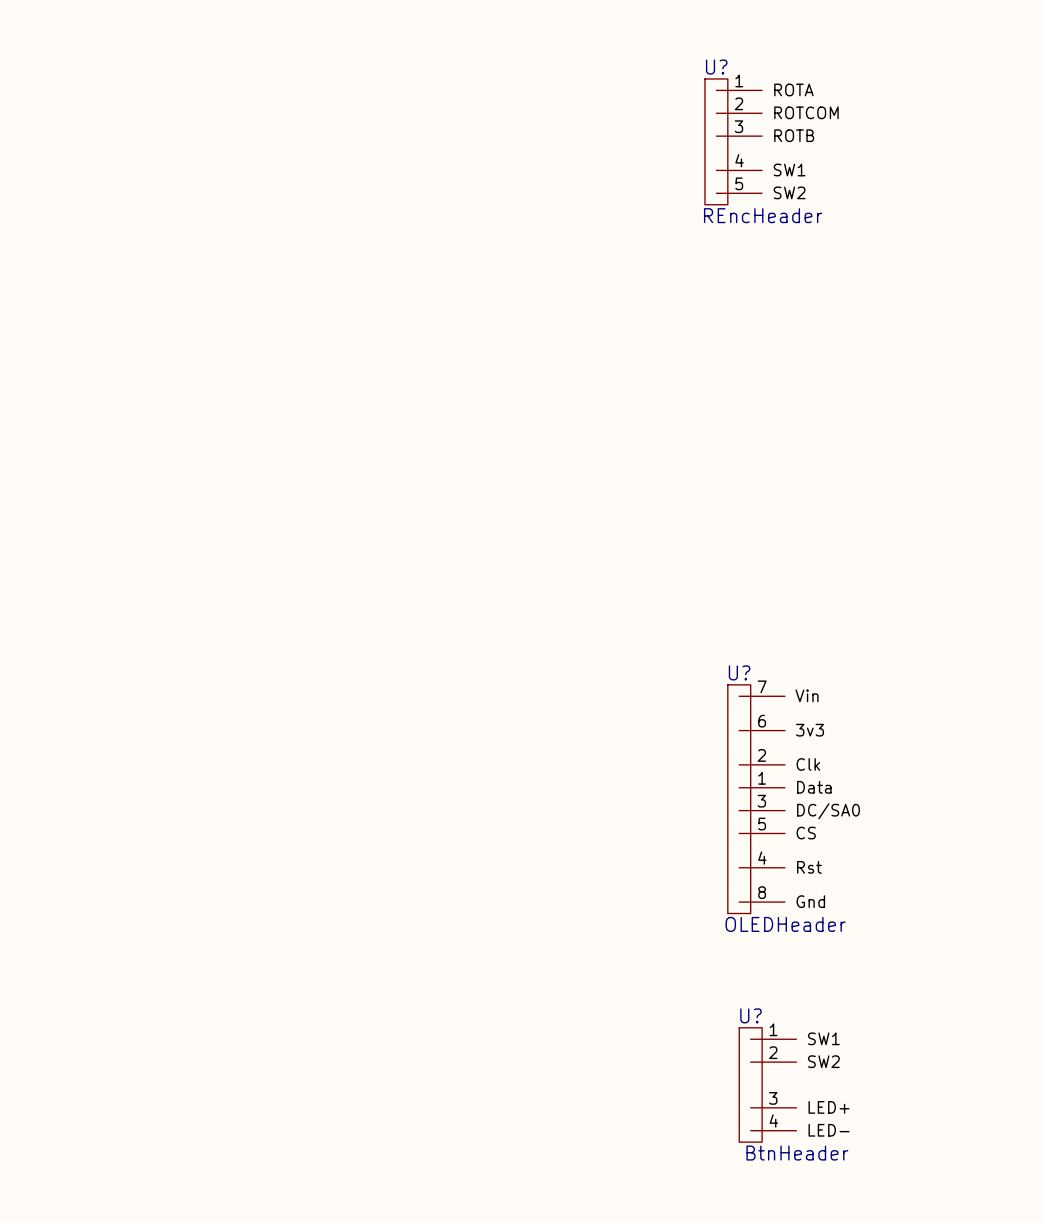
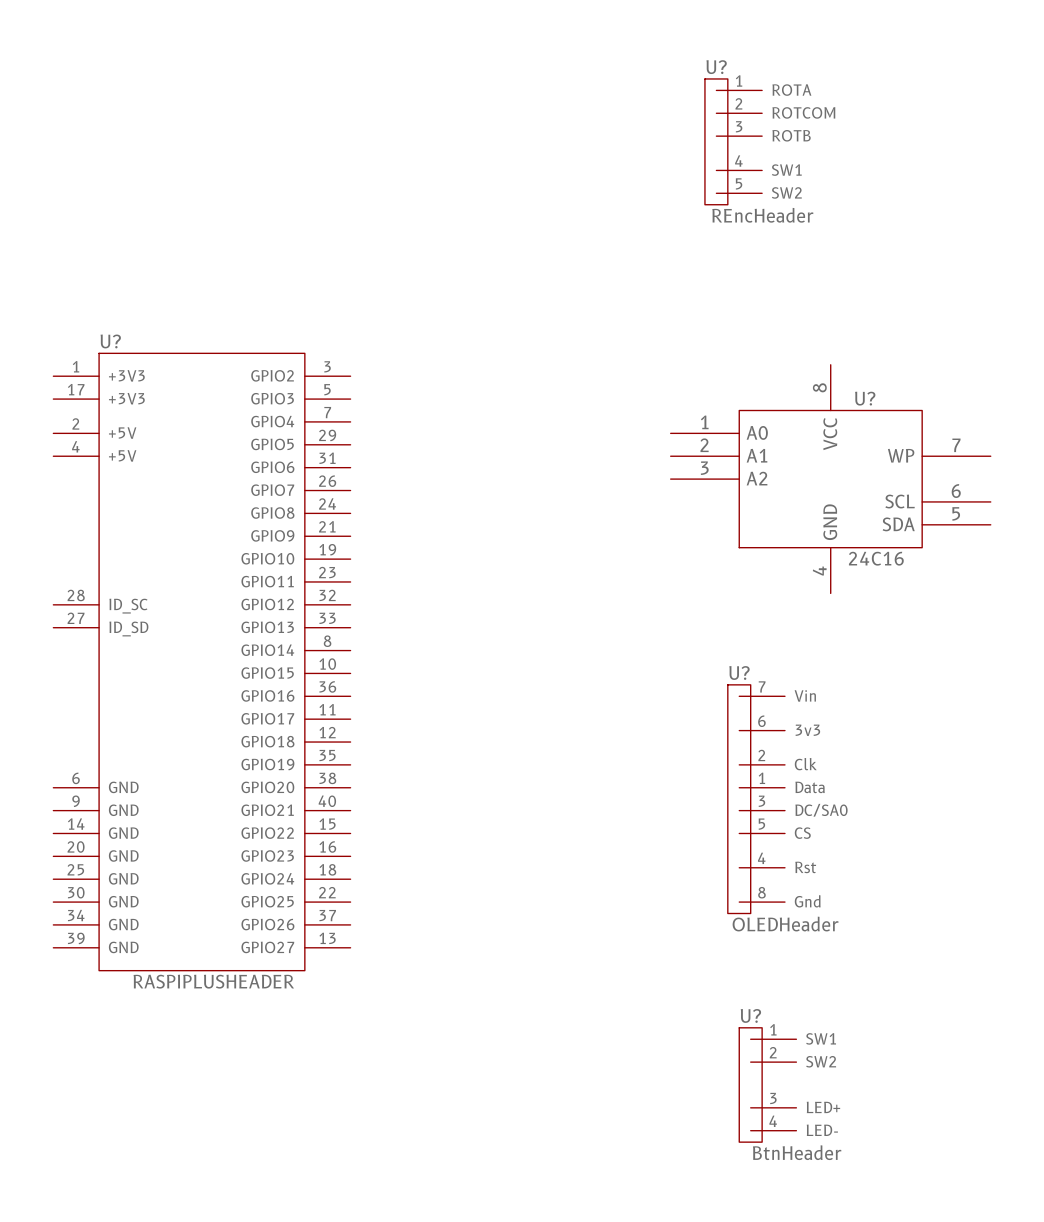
U?: none -> 24C16 (830, 479)
U?: none -> RASPIPLUSHEADER (201, 662)

